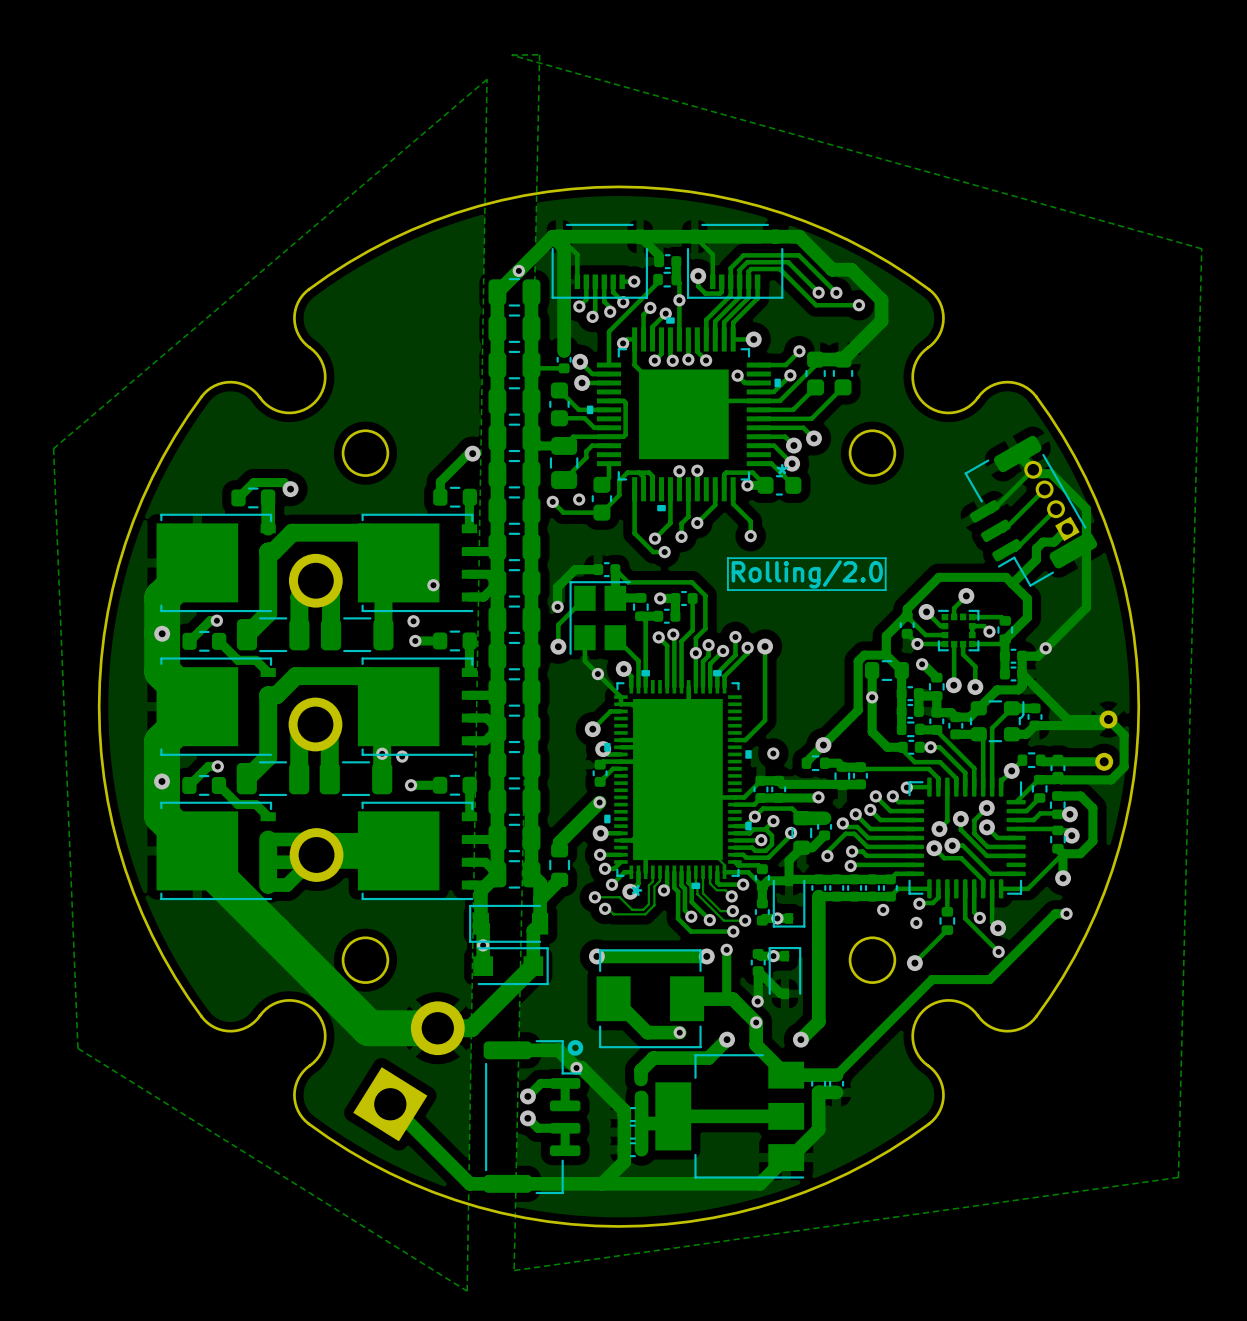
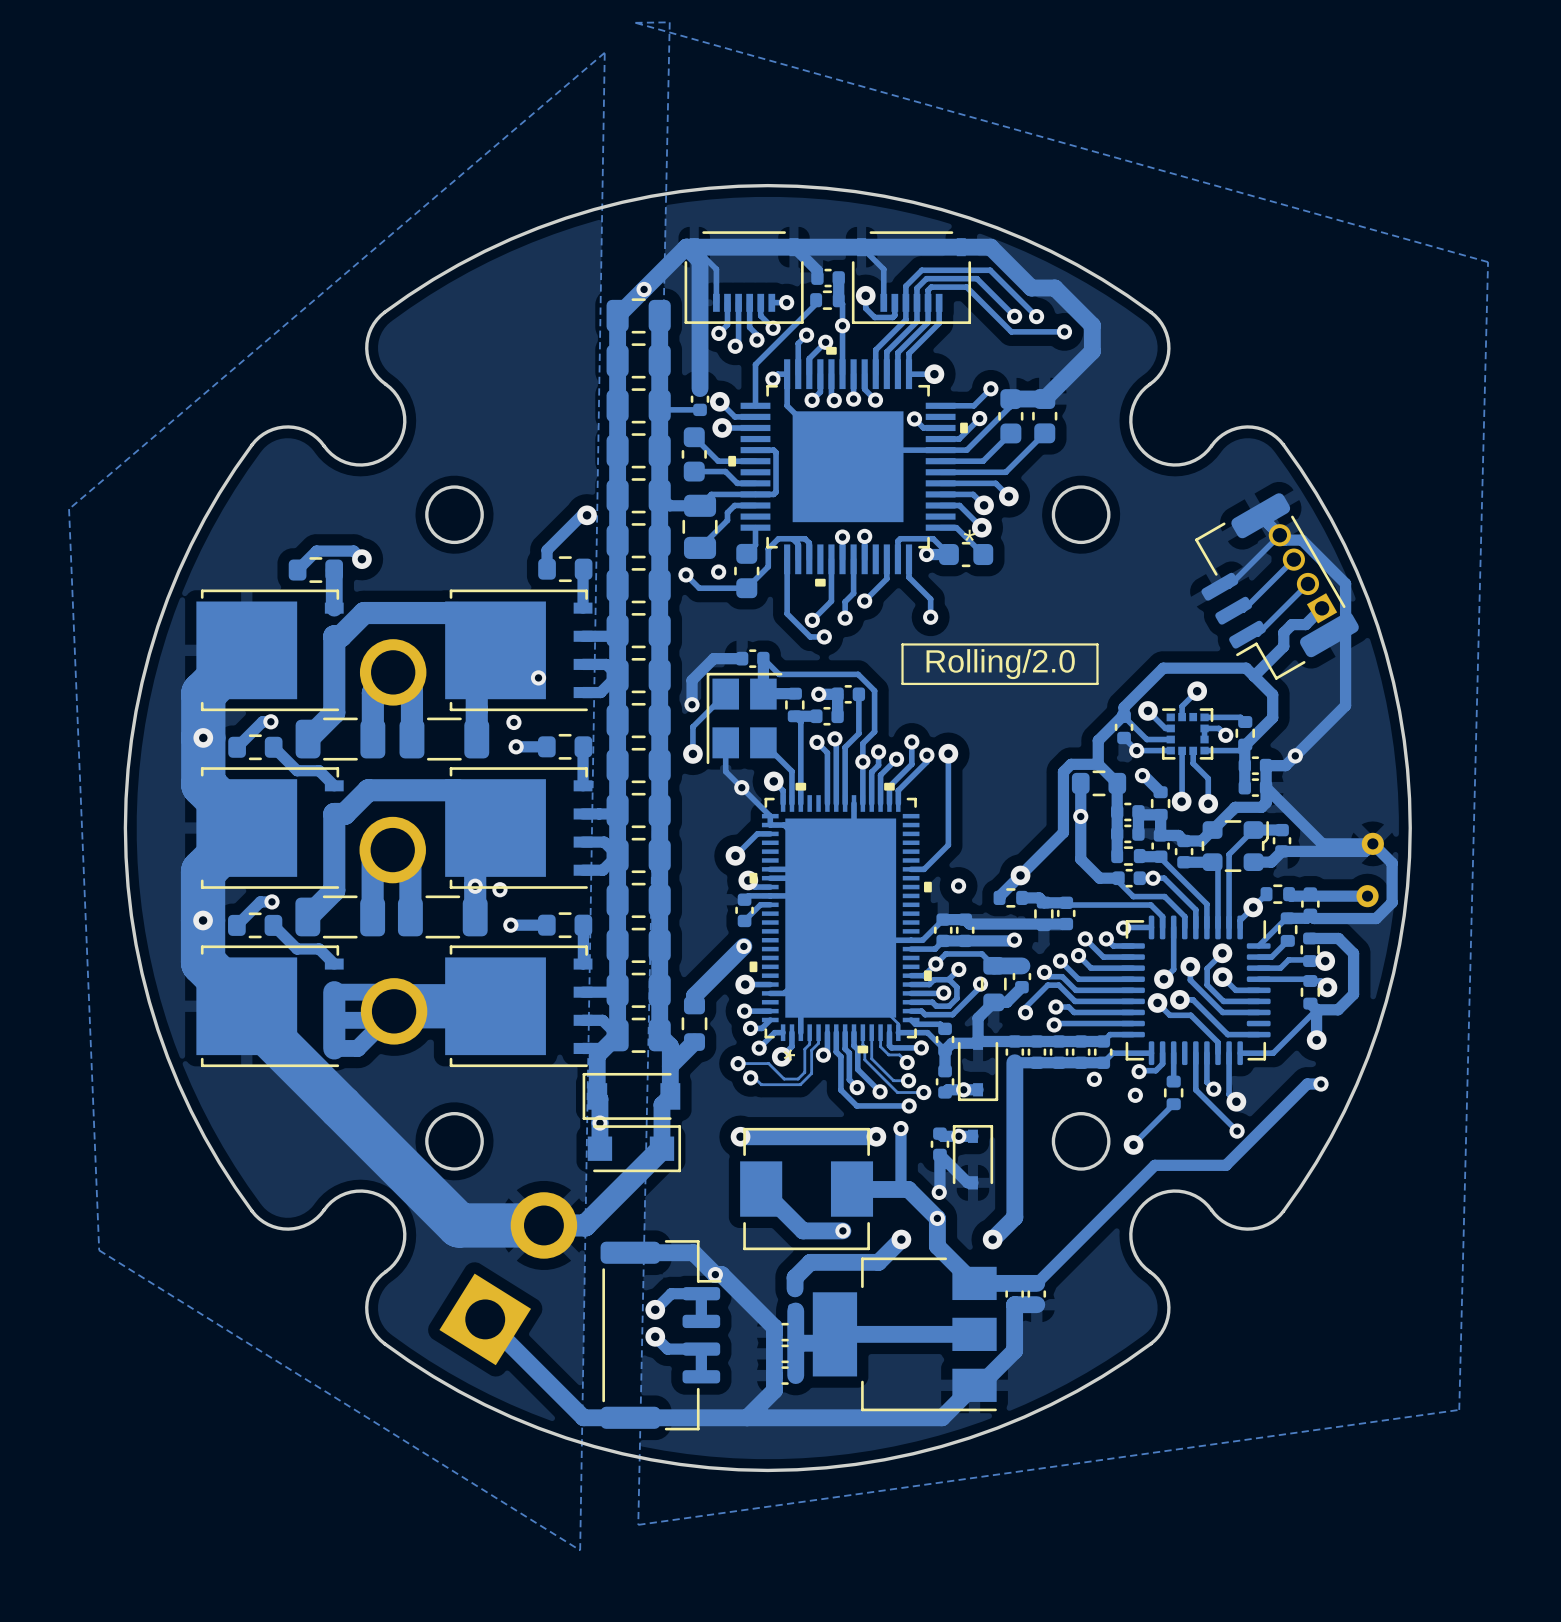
drawing: [567, 1040, 584, 1056] -> none

